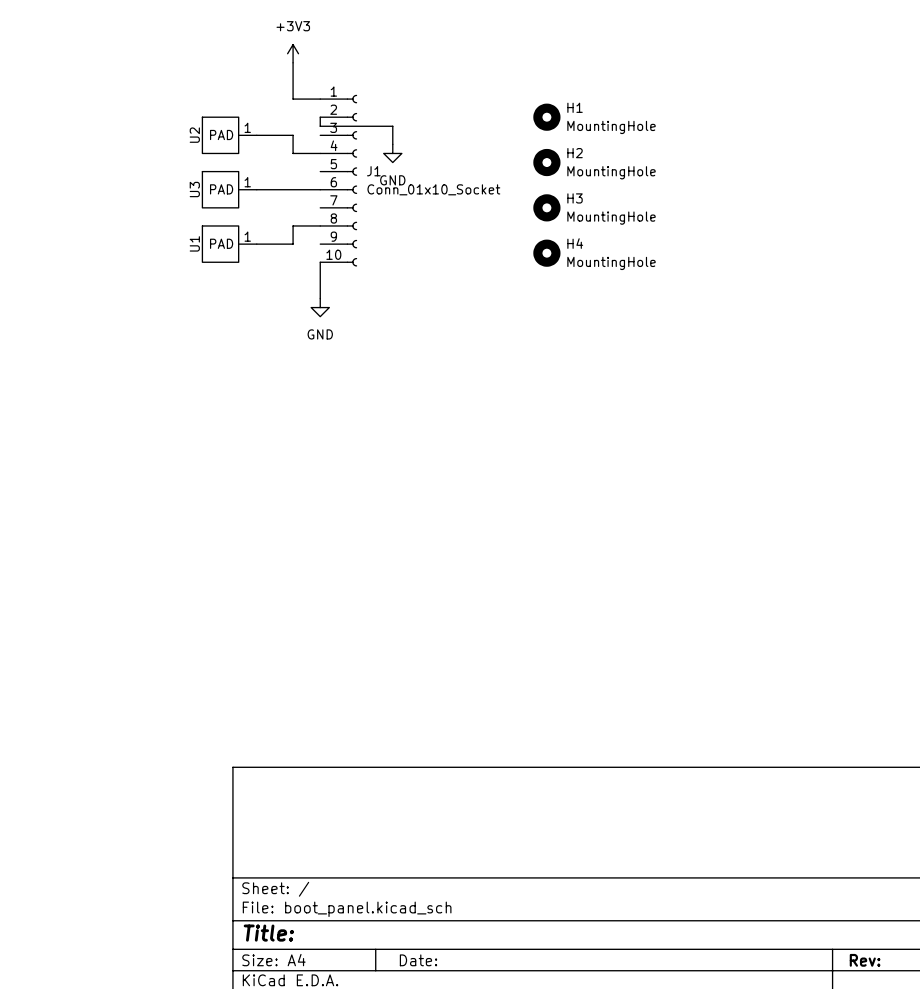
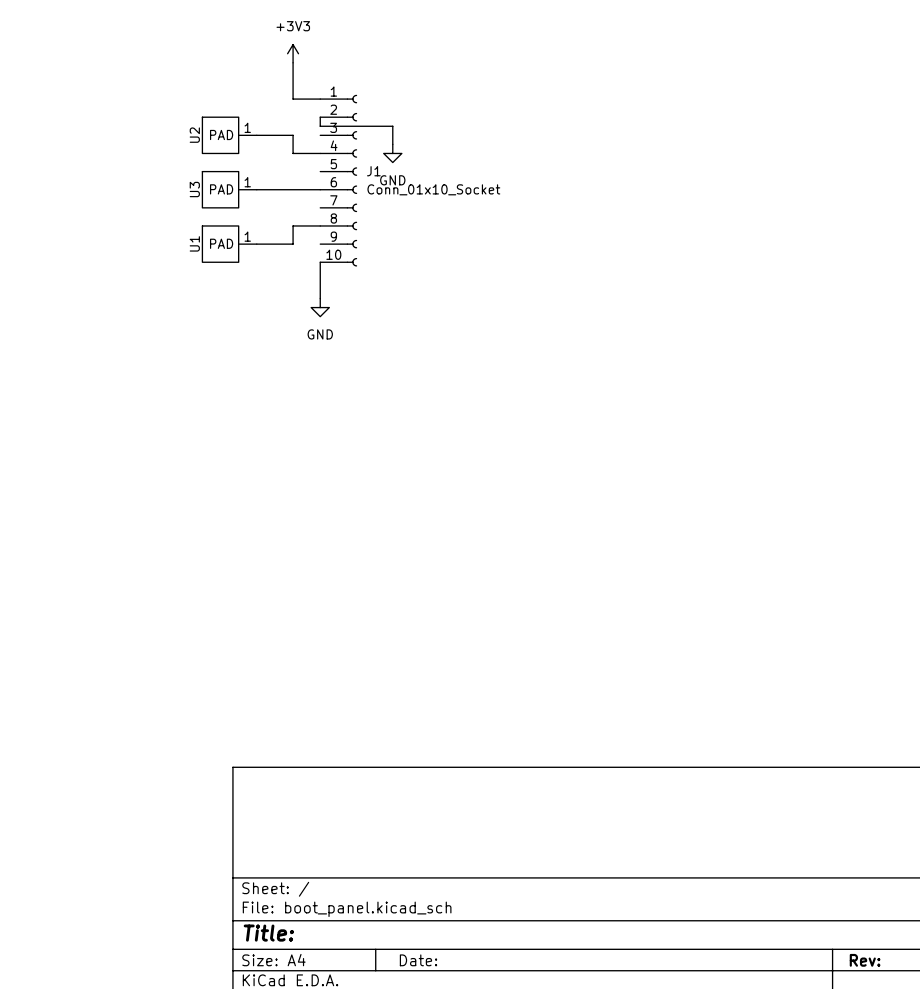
H1: MountingHole (546, 117) -> none
H2: MountingHole (546, 162) -> none
H3: MountingHole (546, 207) -> none
H4: MountingHole (546, 253) -> none

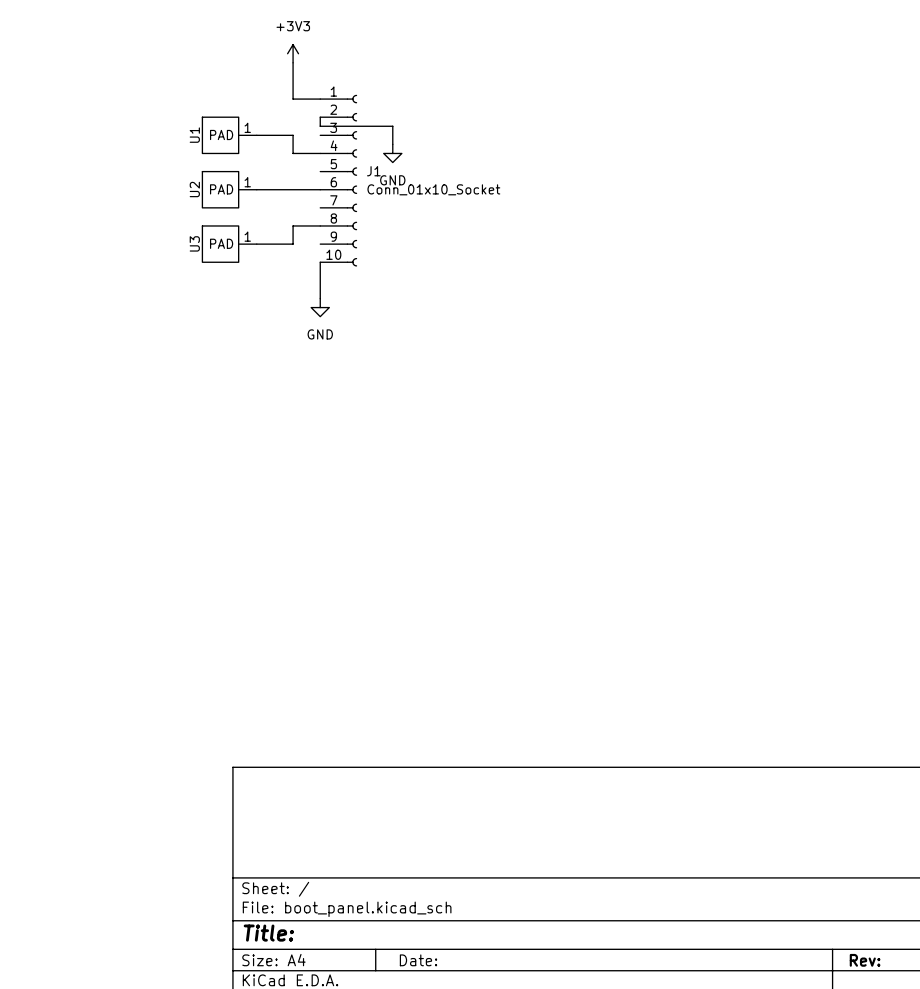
U2 name: U2 (194, 135) -> U1 (194, 135)
U3 name: U3 (194, 189) -> U2 (194, 189)
U1 name: U1 (194, 243) -> U3 (194, 243)

